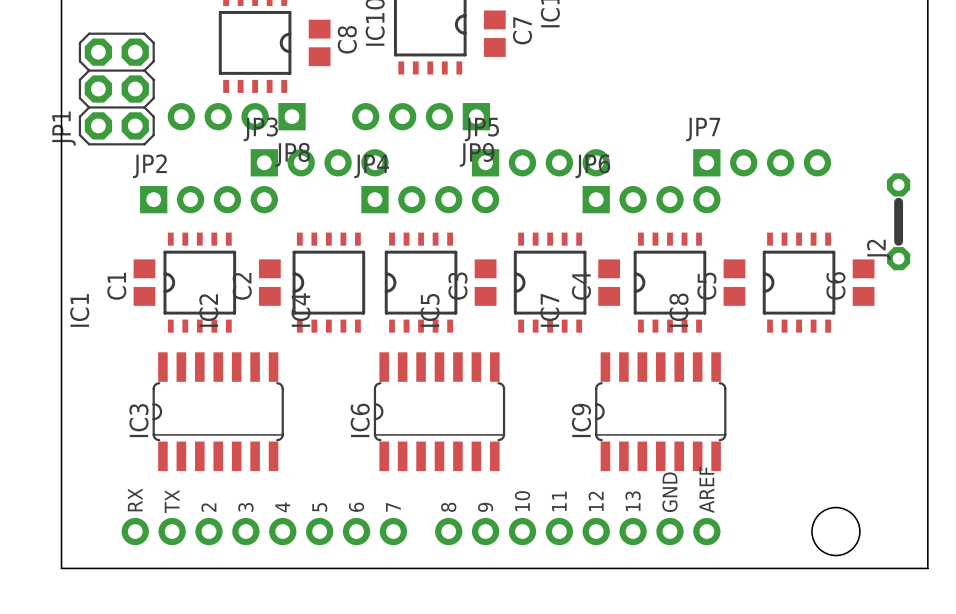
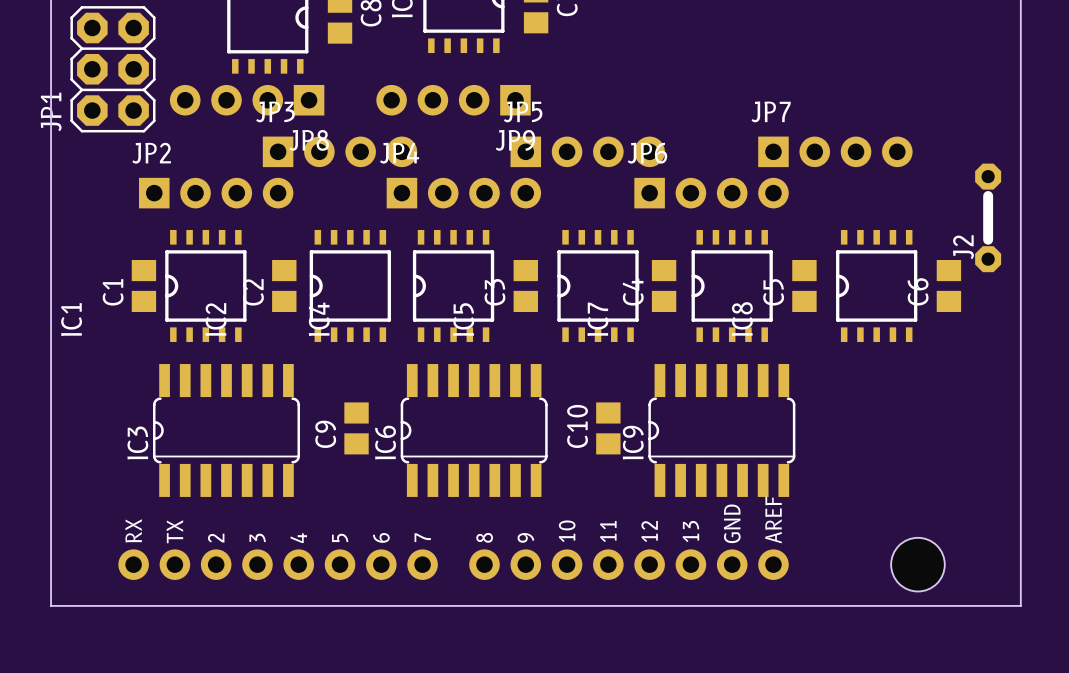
C9: none -> (356, 428)
C10: none -> (608, 428)

